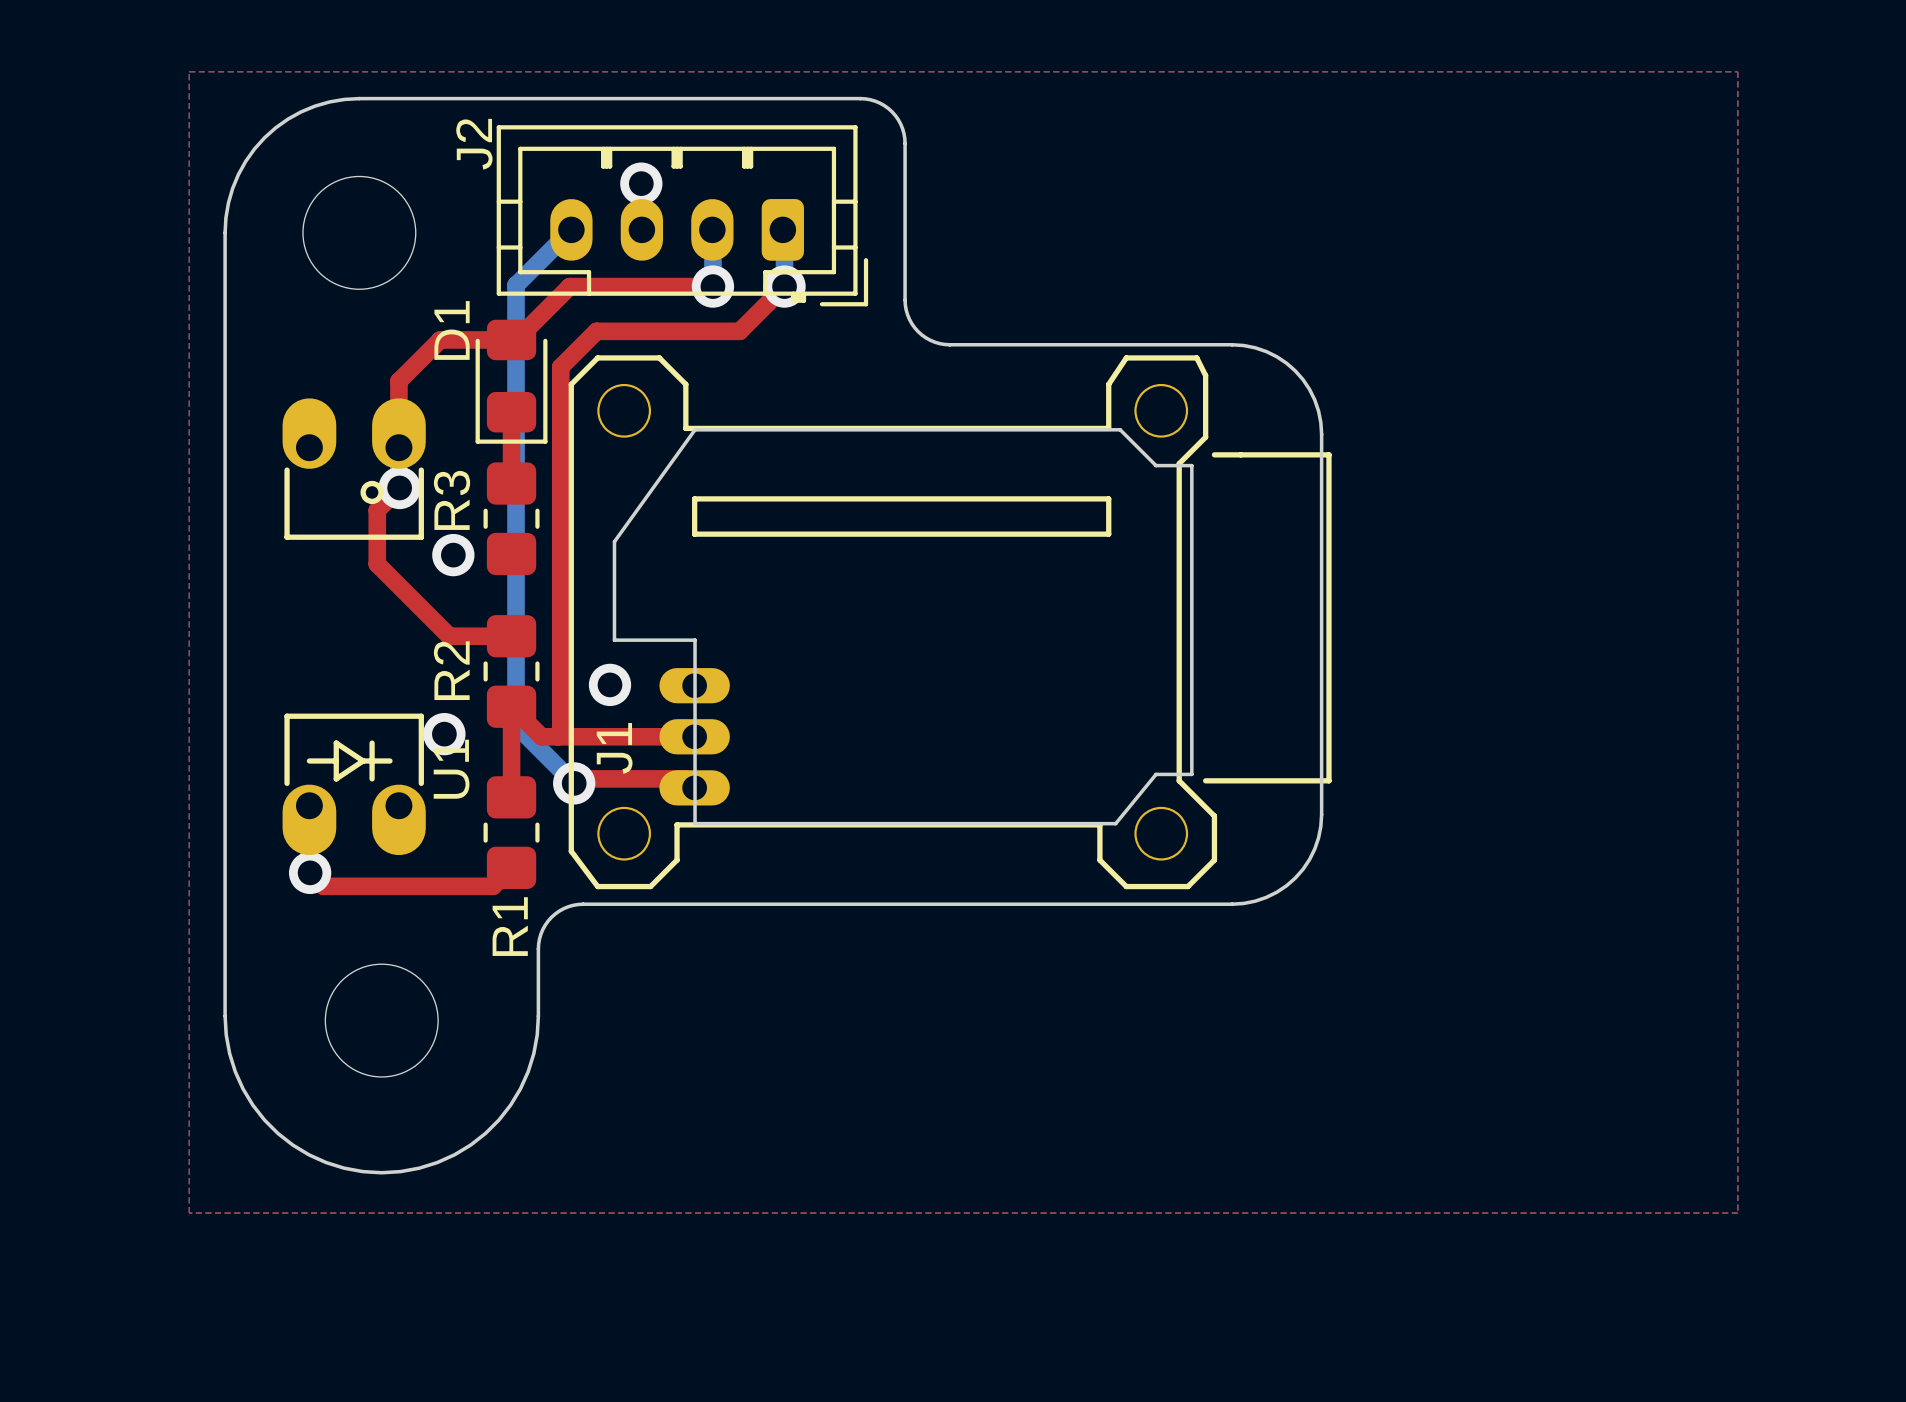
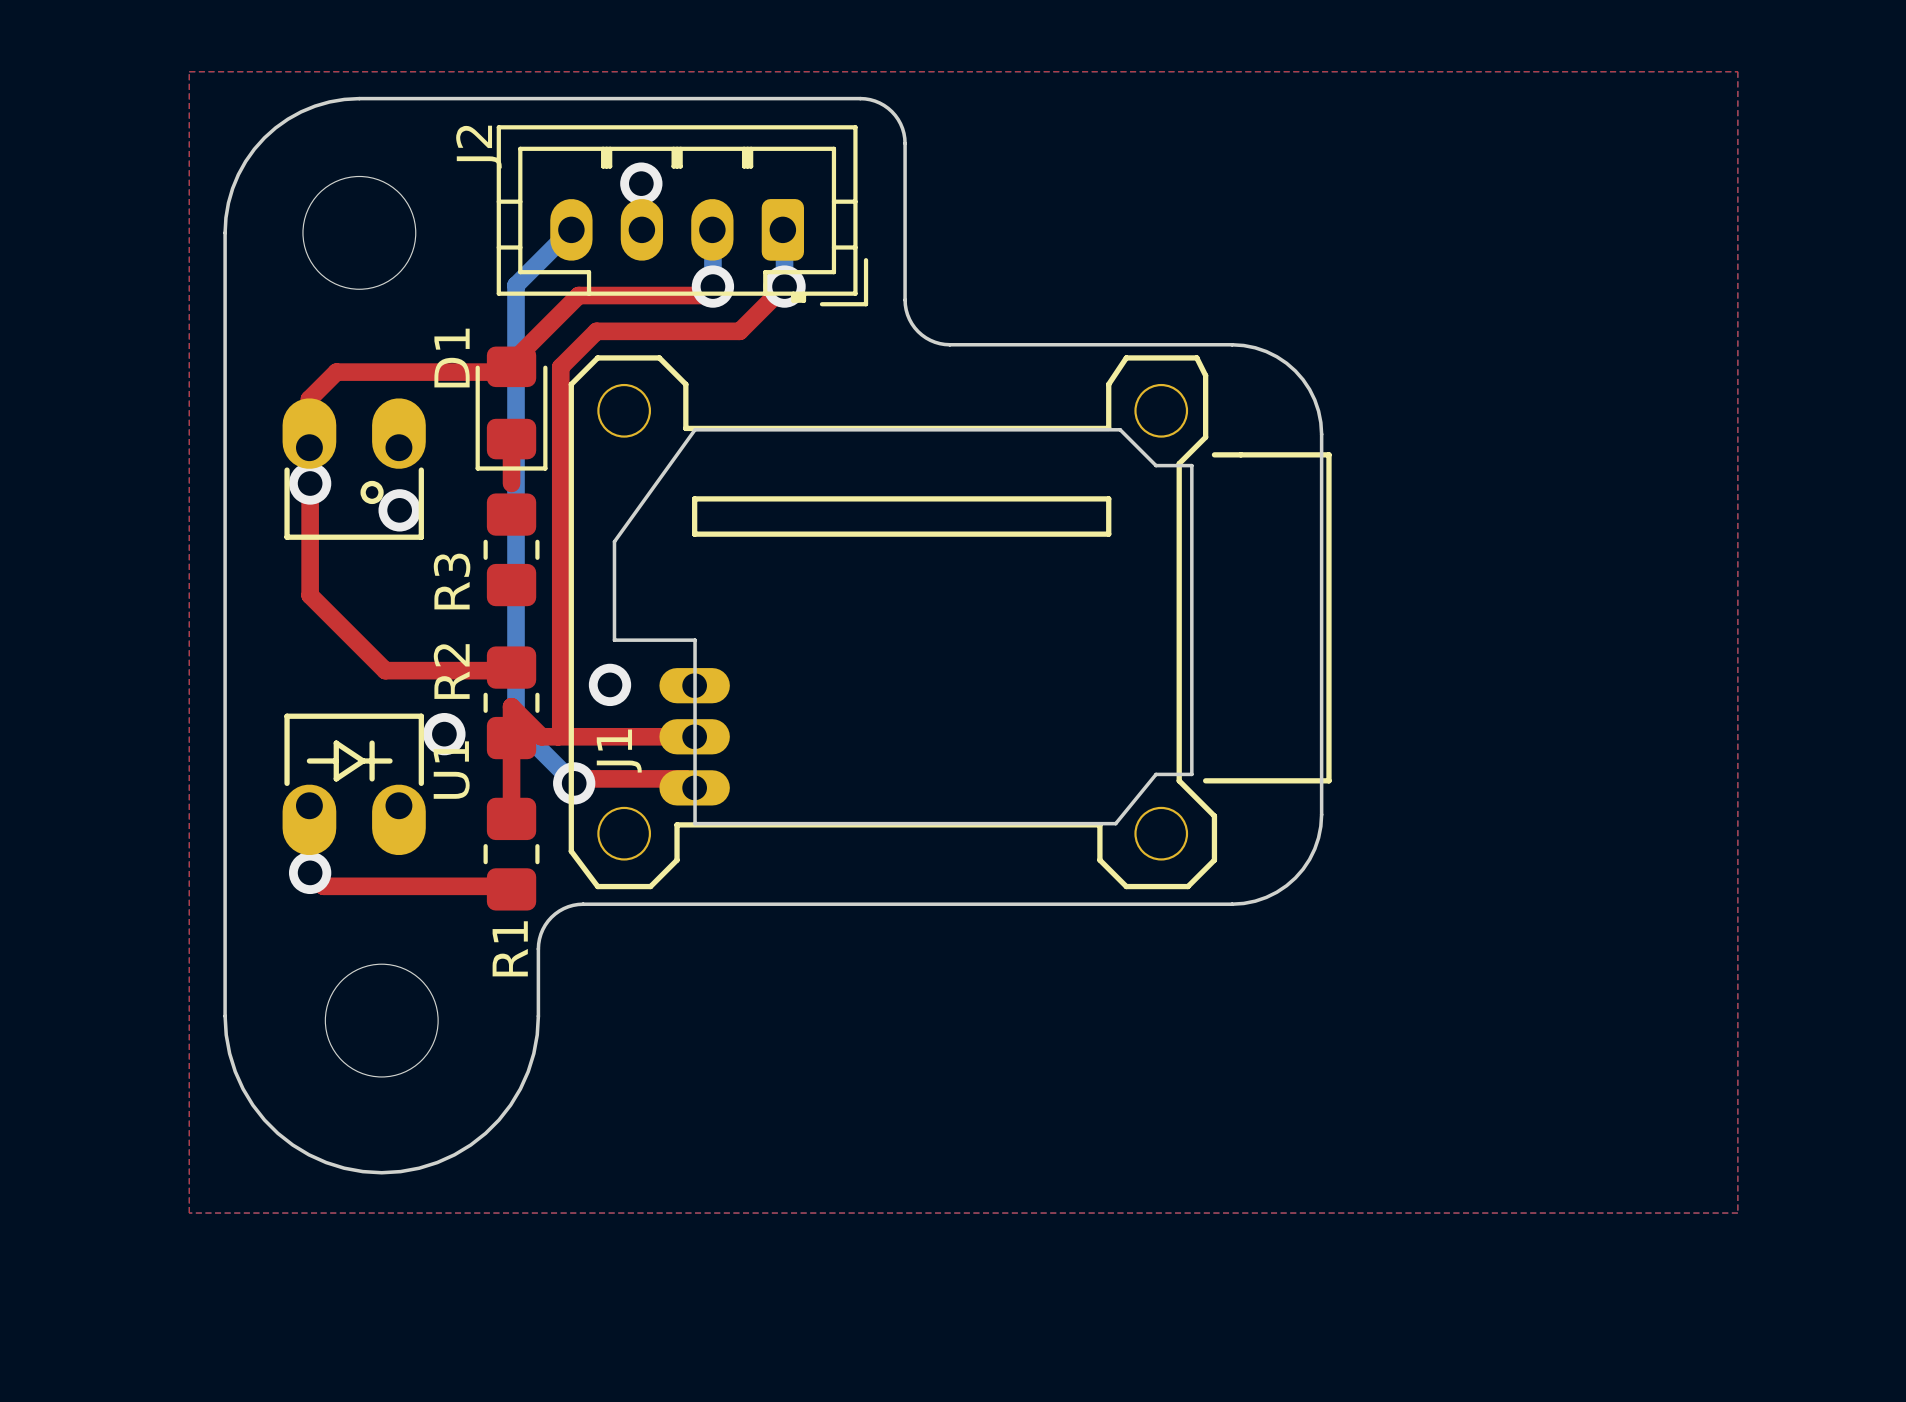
top track: (712, 286) (569, 286) (516, 339) (440, 339) (398, 381) (398, 447) -> (712, 286) (703, 295) (578, 295) (511, 362) (511, 372) (336, 372) (309, 399) (309, 447)
D1 position: (511, 381) -> (511, 408)
top track: none -> (310, 483) (310, 595) (385, 670) (511, 670)
via: none -> (310, 483)
top track: (399, 487) (377, 510) (377, 564) (449, 636) (511, 636) -> none
via position: (399, 487) -> (399, 510)
R3 name position: R3 (452, 500) -> R3 (452, 581)
R3 position: (511, 518) -> (511, 549)
via: (453, 555) -> none
R2 position: (511, 671) -> (511, 702)
R1 position: (511, 832) -> (511, 854)

